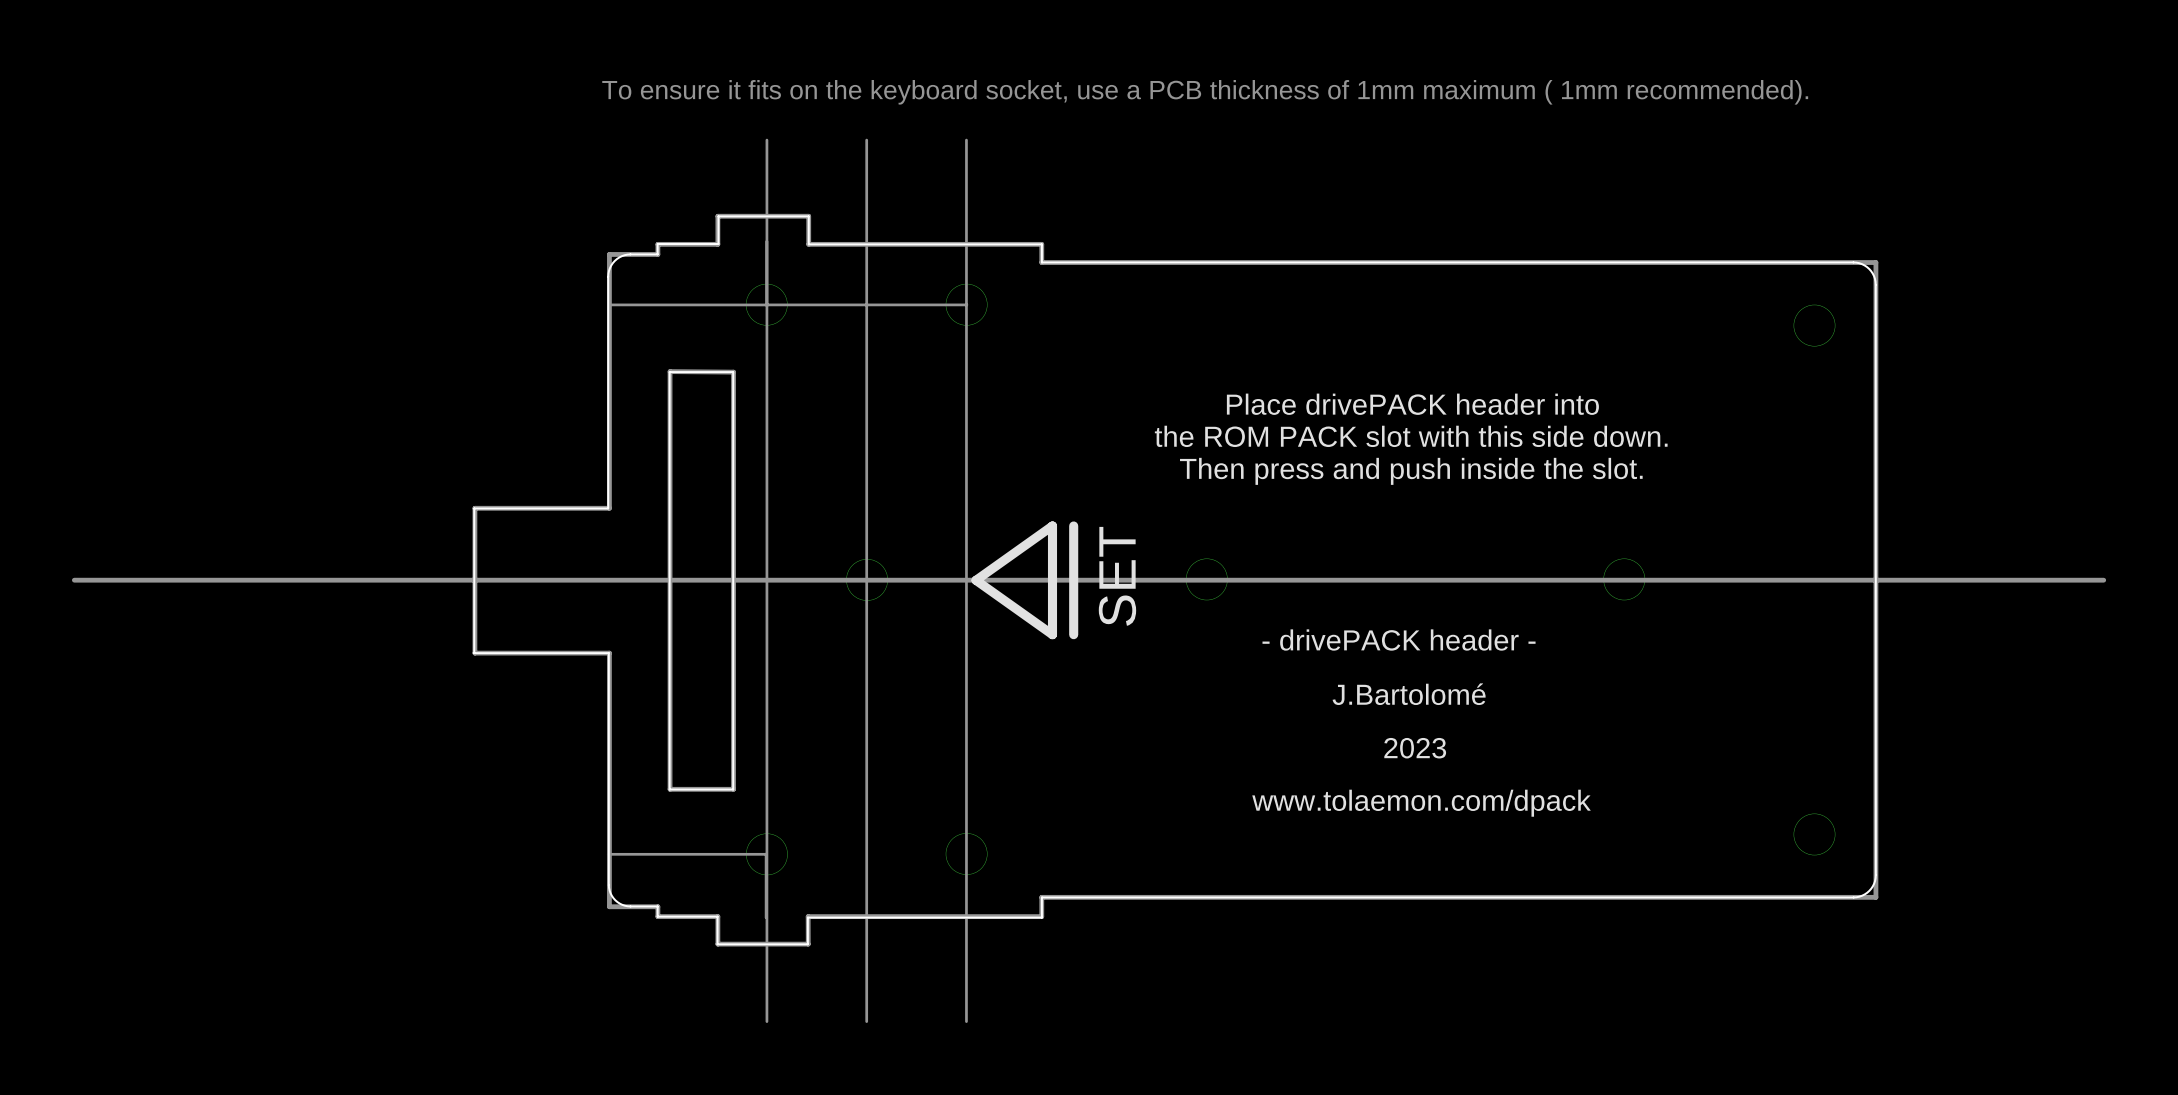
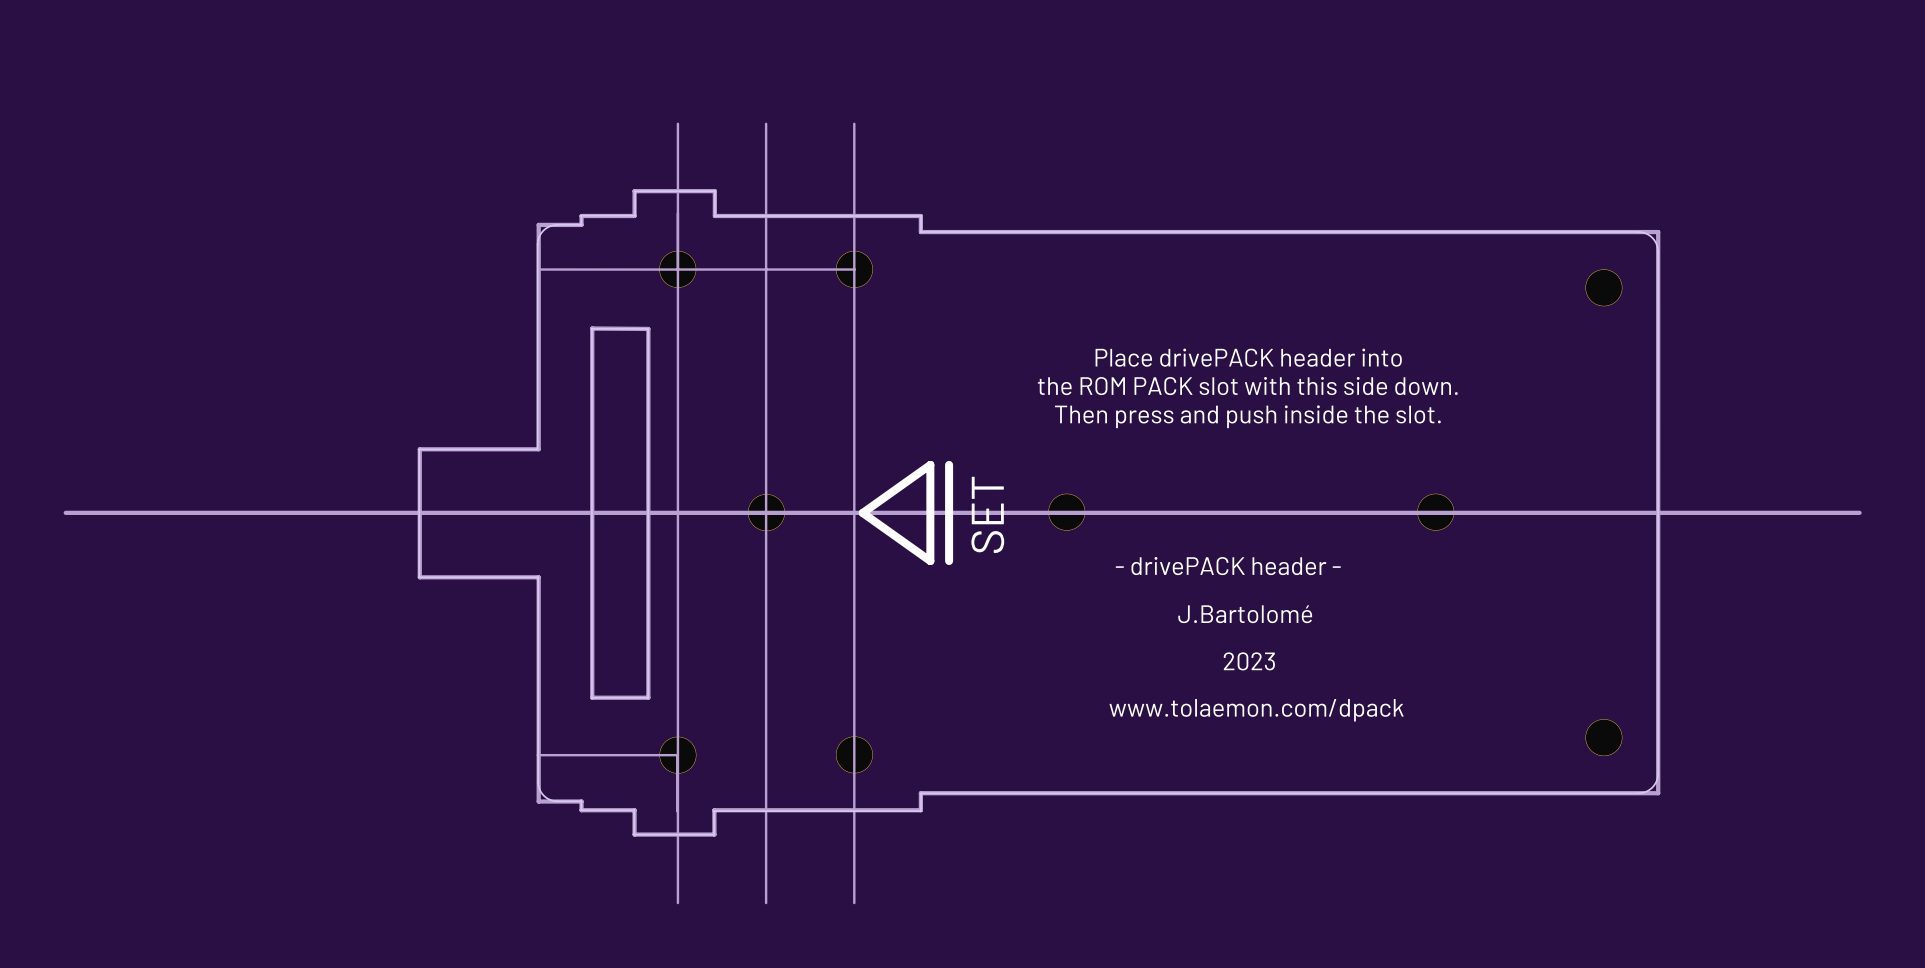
text: To ensure it fits on the keyboard socket, use a PCB thickness of 1mm maximum ( 1mm recommended). (1205, 92) -> none

